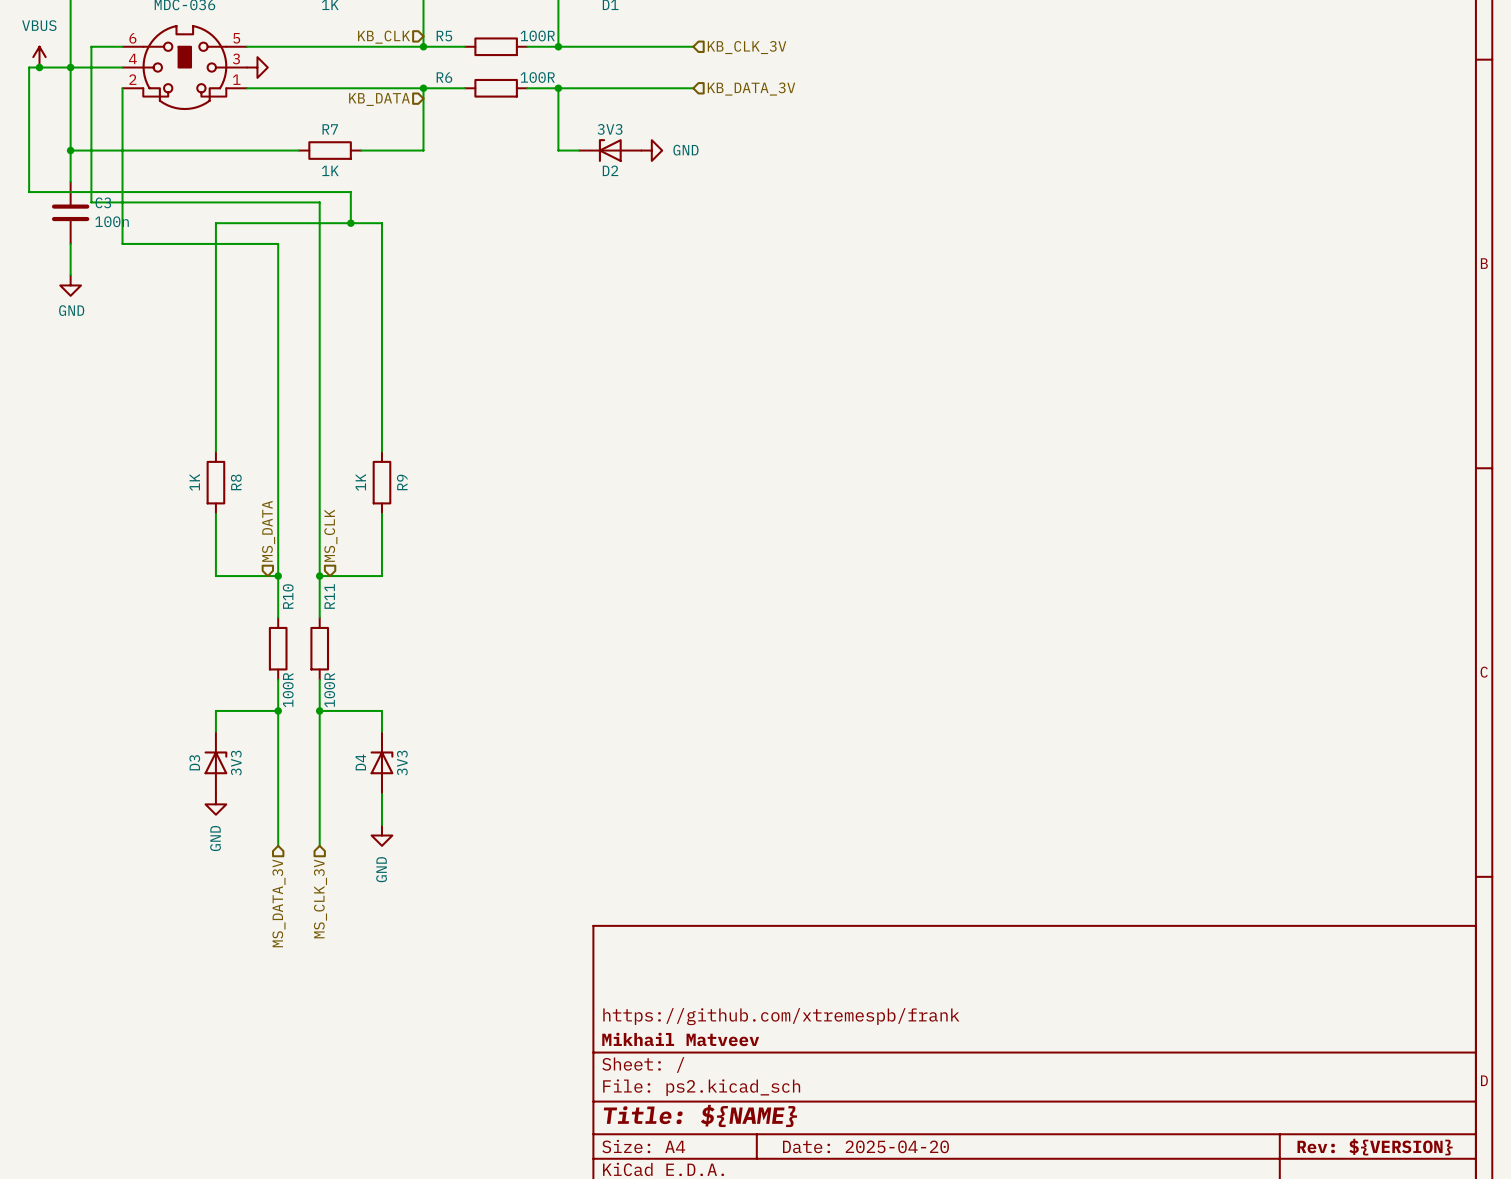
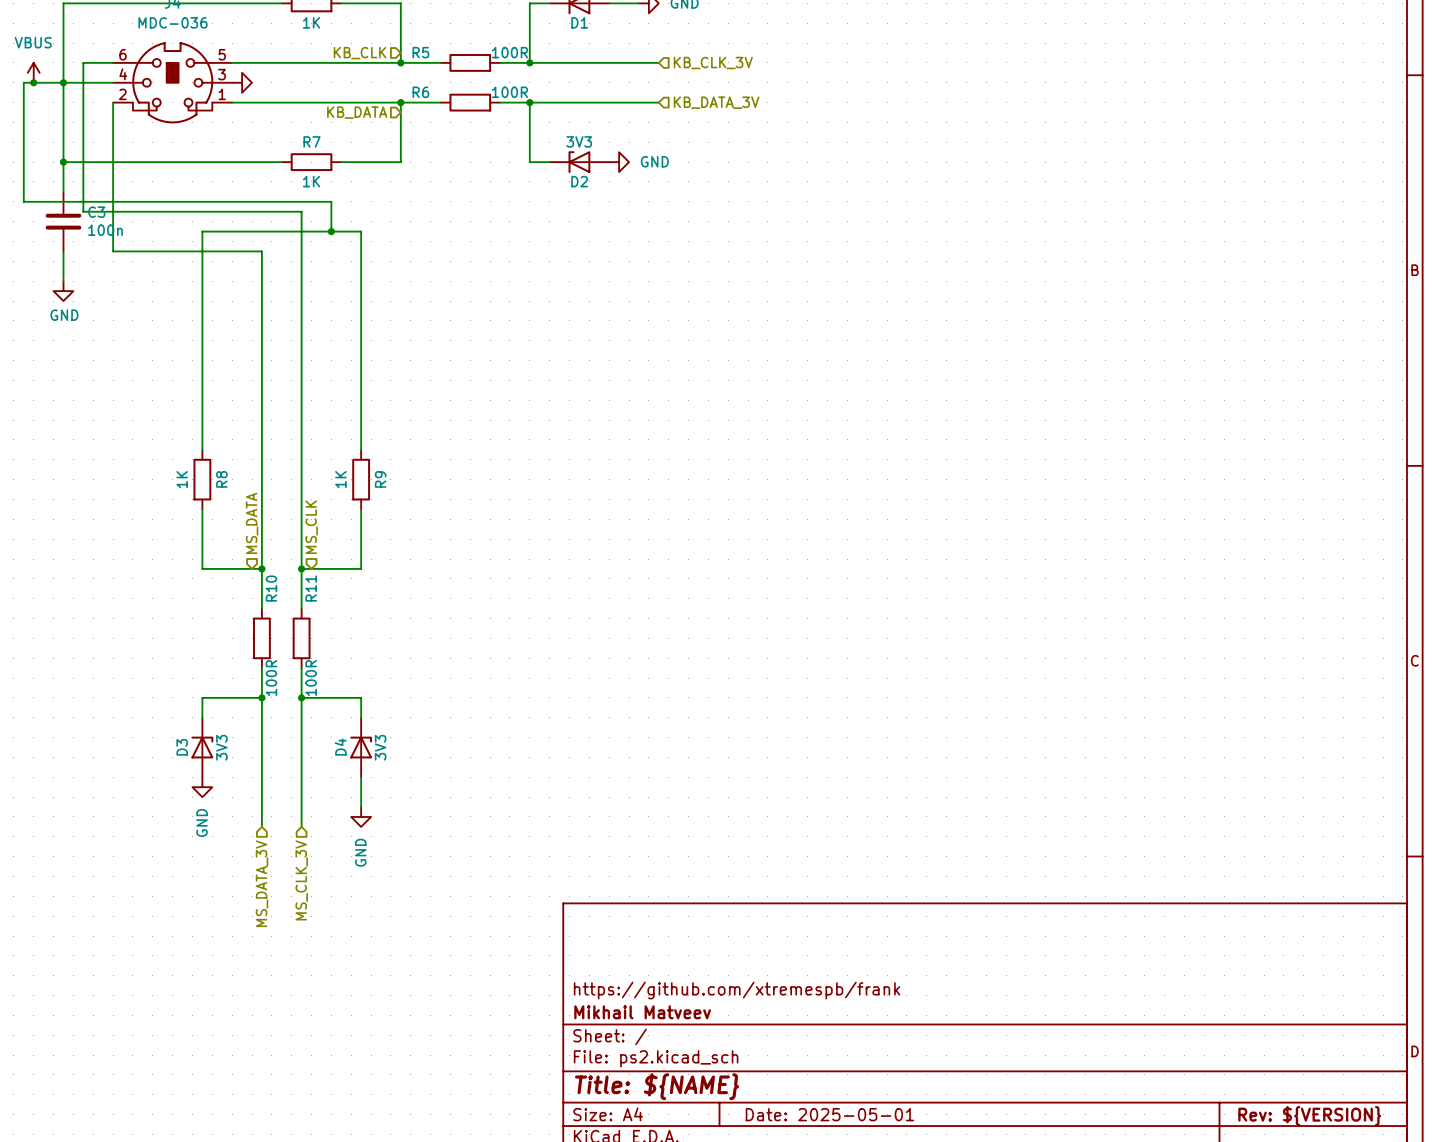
title block: Date: 2025-04-20 (865, 1146) -> Date: 2025-05-01 (829, 1114)

